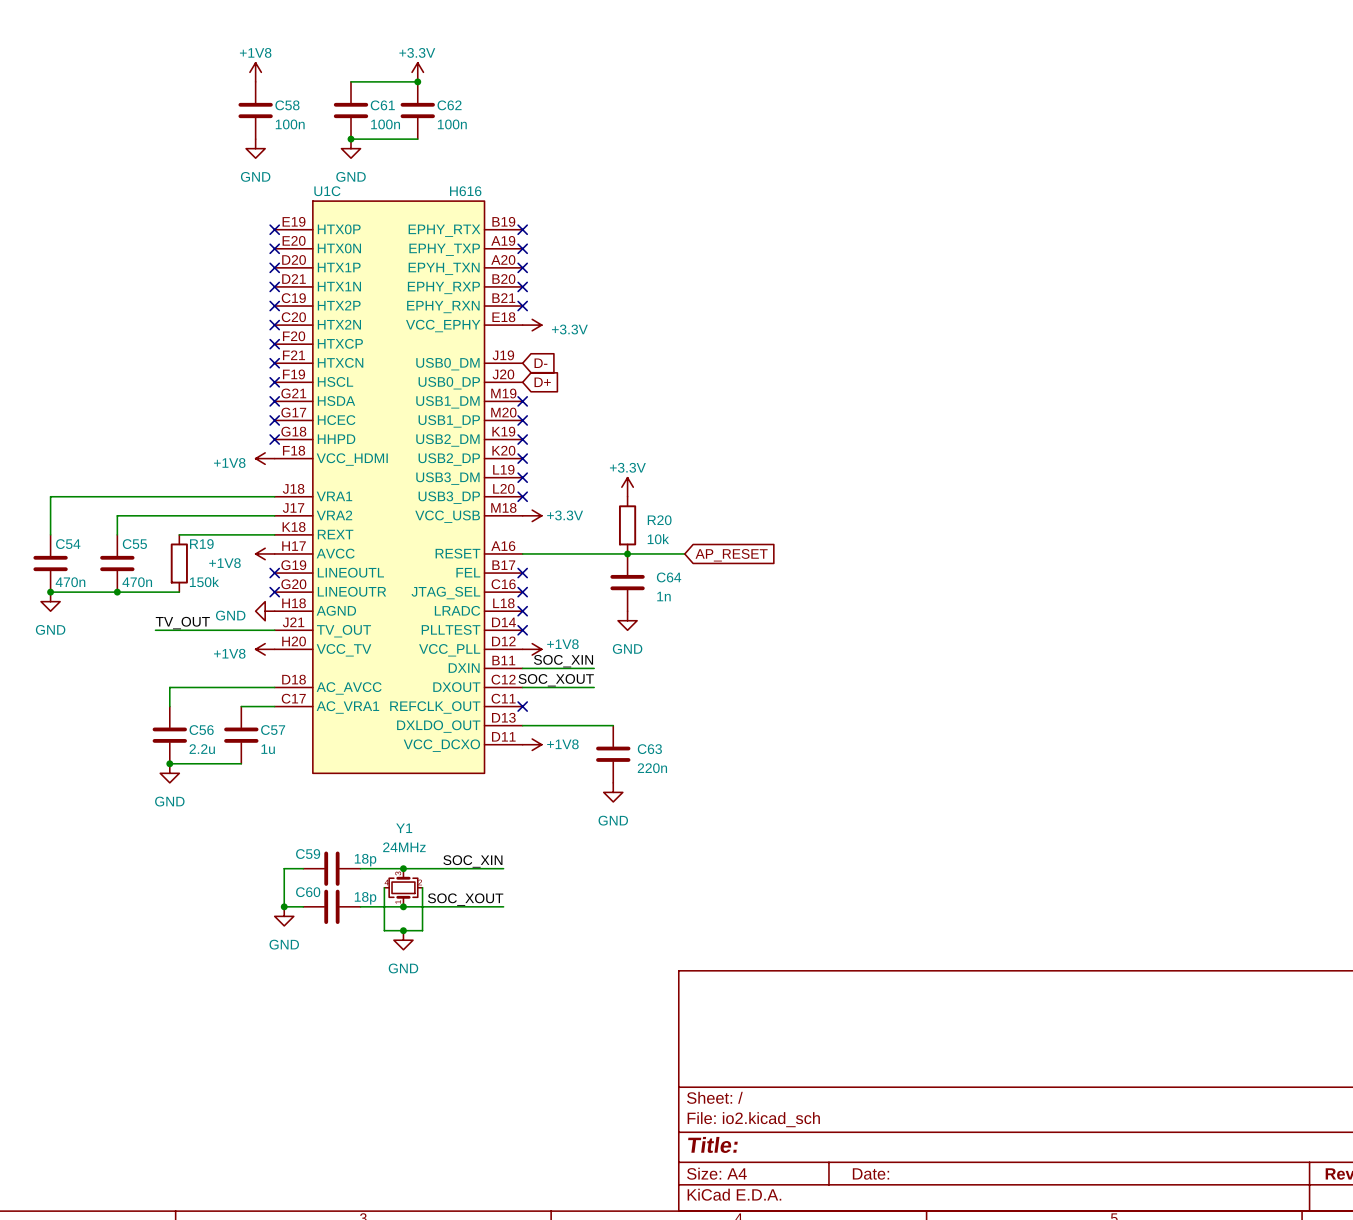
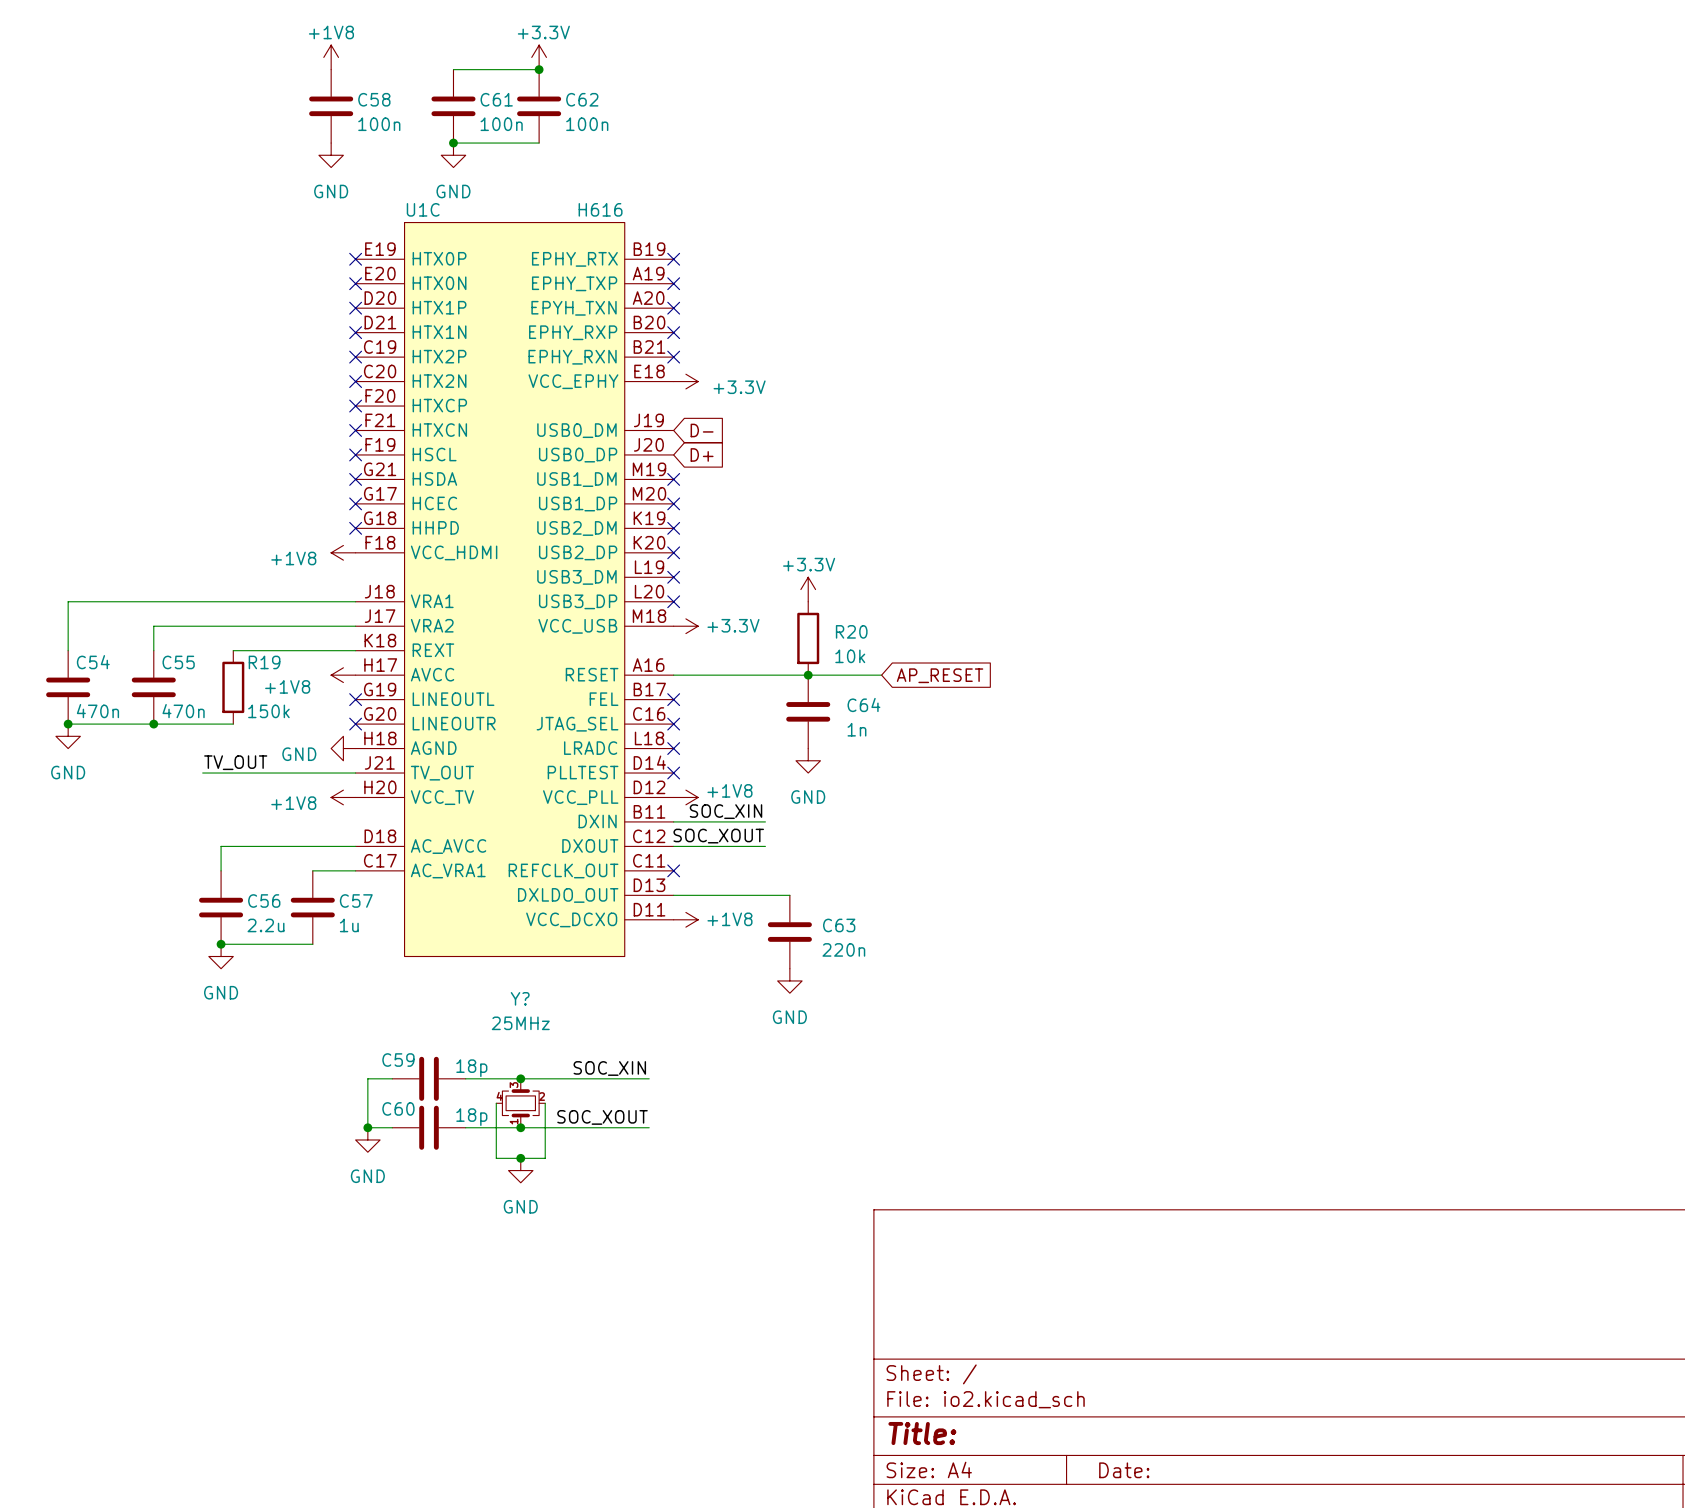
Y1 name: Y1 (404, 828) -> Y? (520, 998)
Y1 value: 24MHz (404, 847) -> 25MHz (520, 1023)

